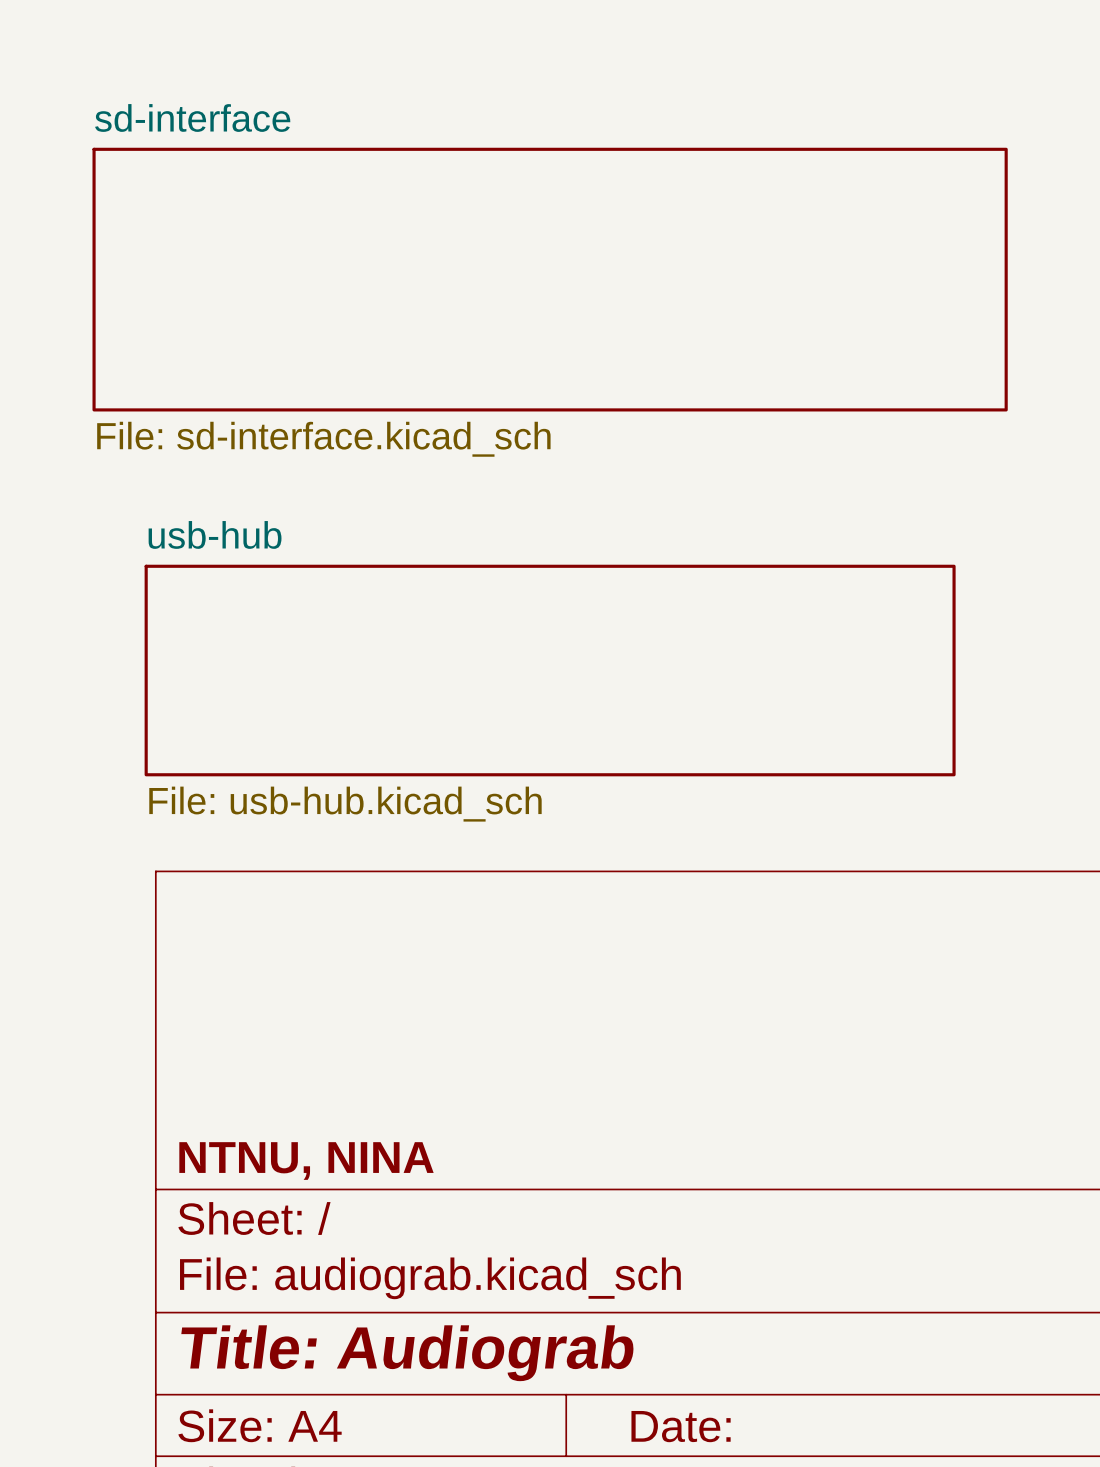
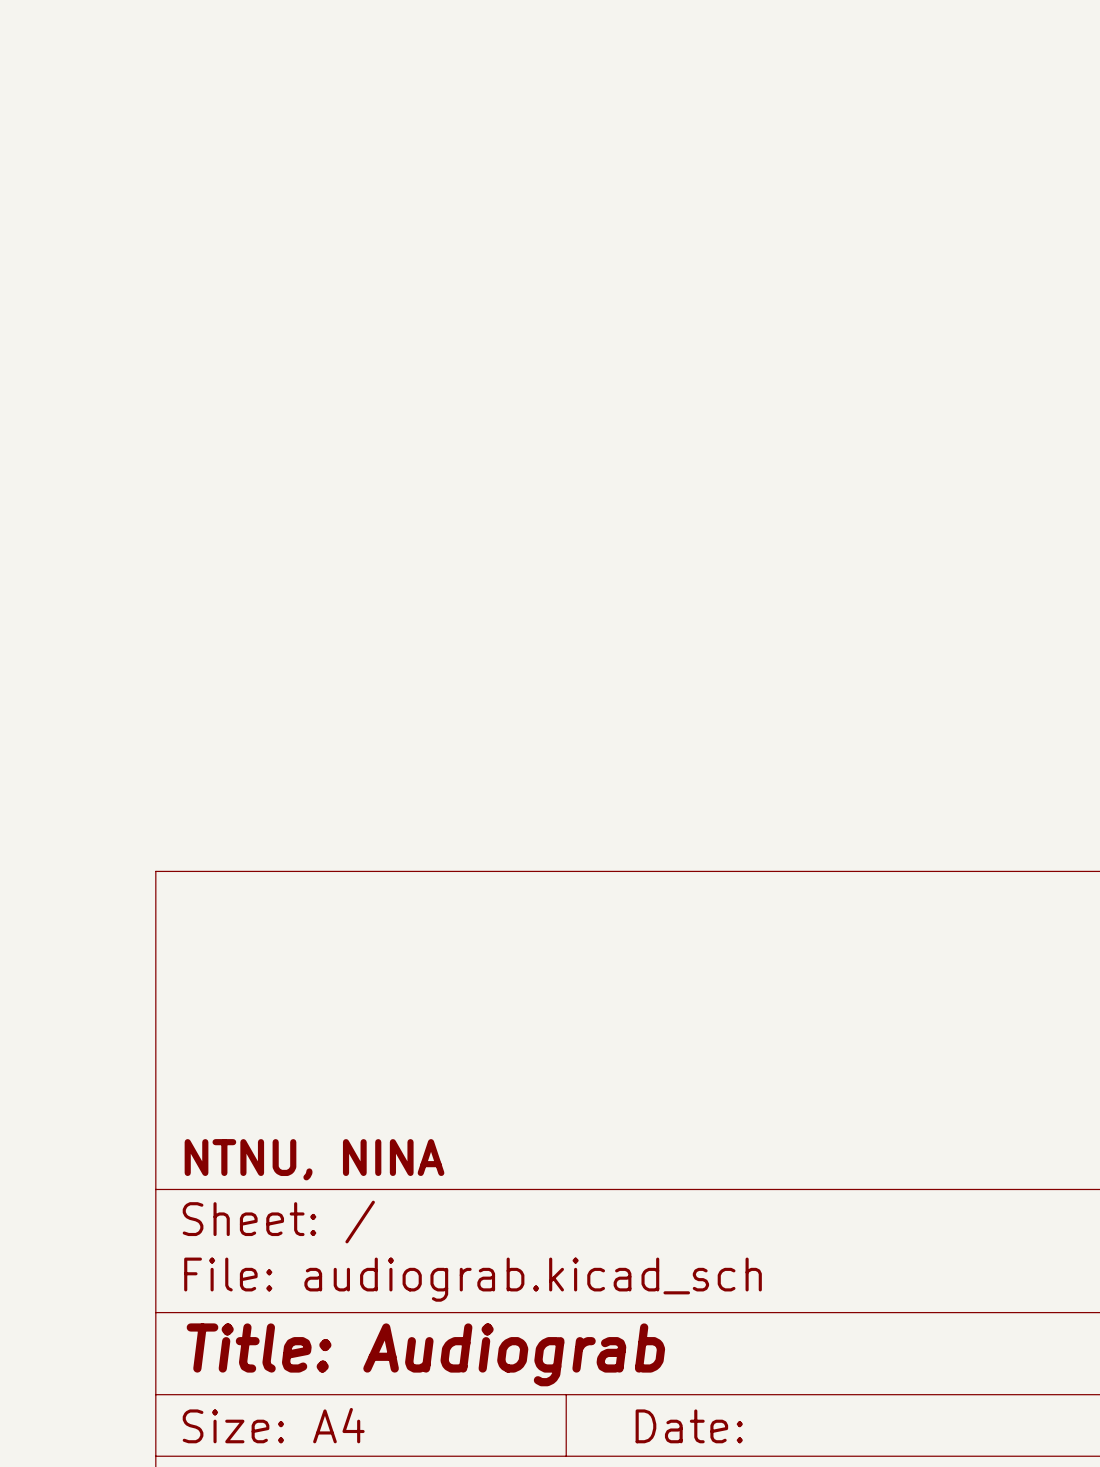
sheet sd-interface: File: sd-interface.kicad_sch (550, 279) -> none
sheet usb-hub: File: usb-hub.kicad_sch (550, 670) -> none

